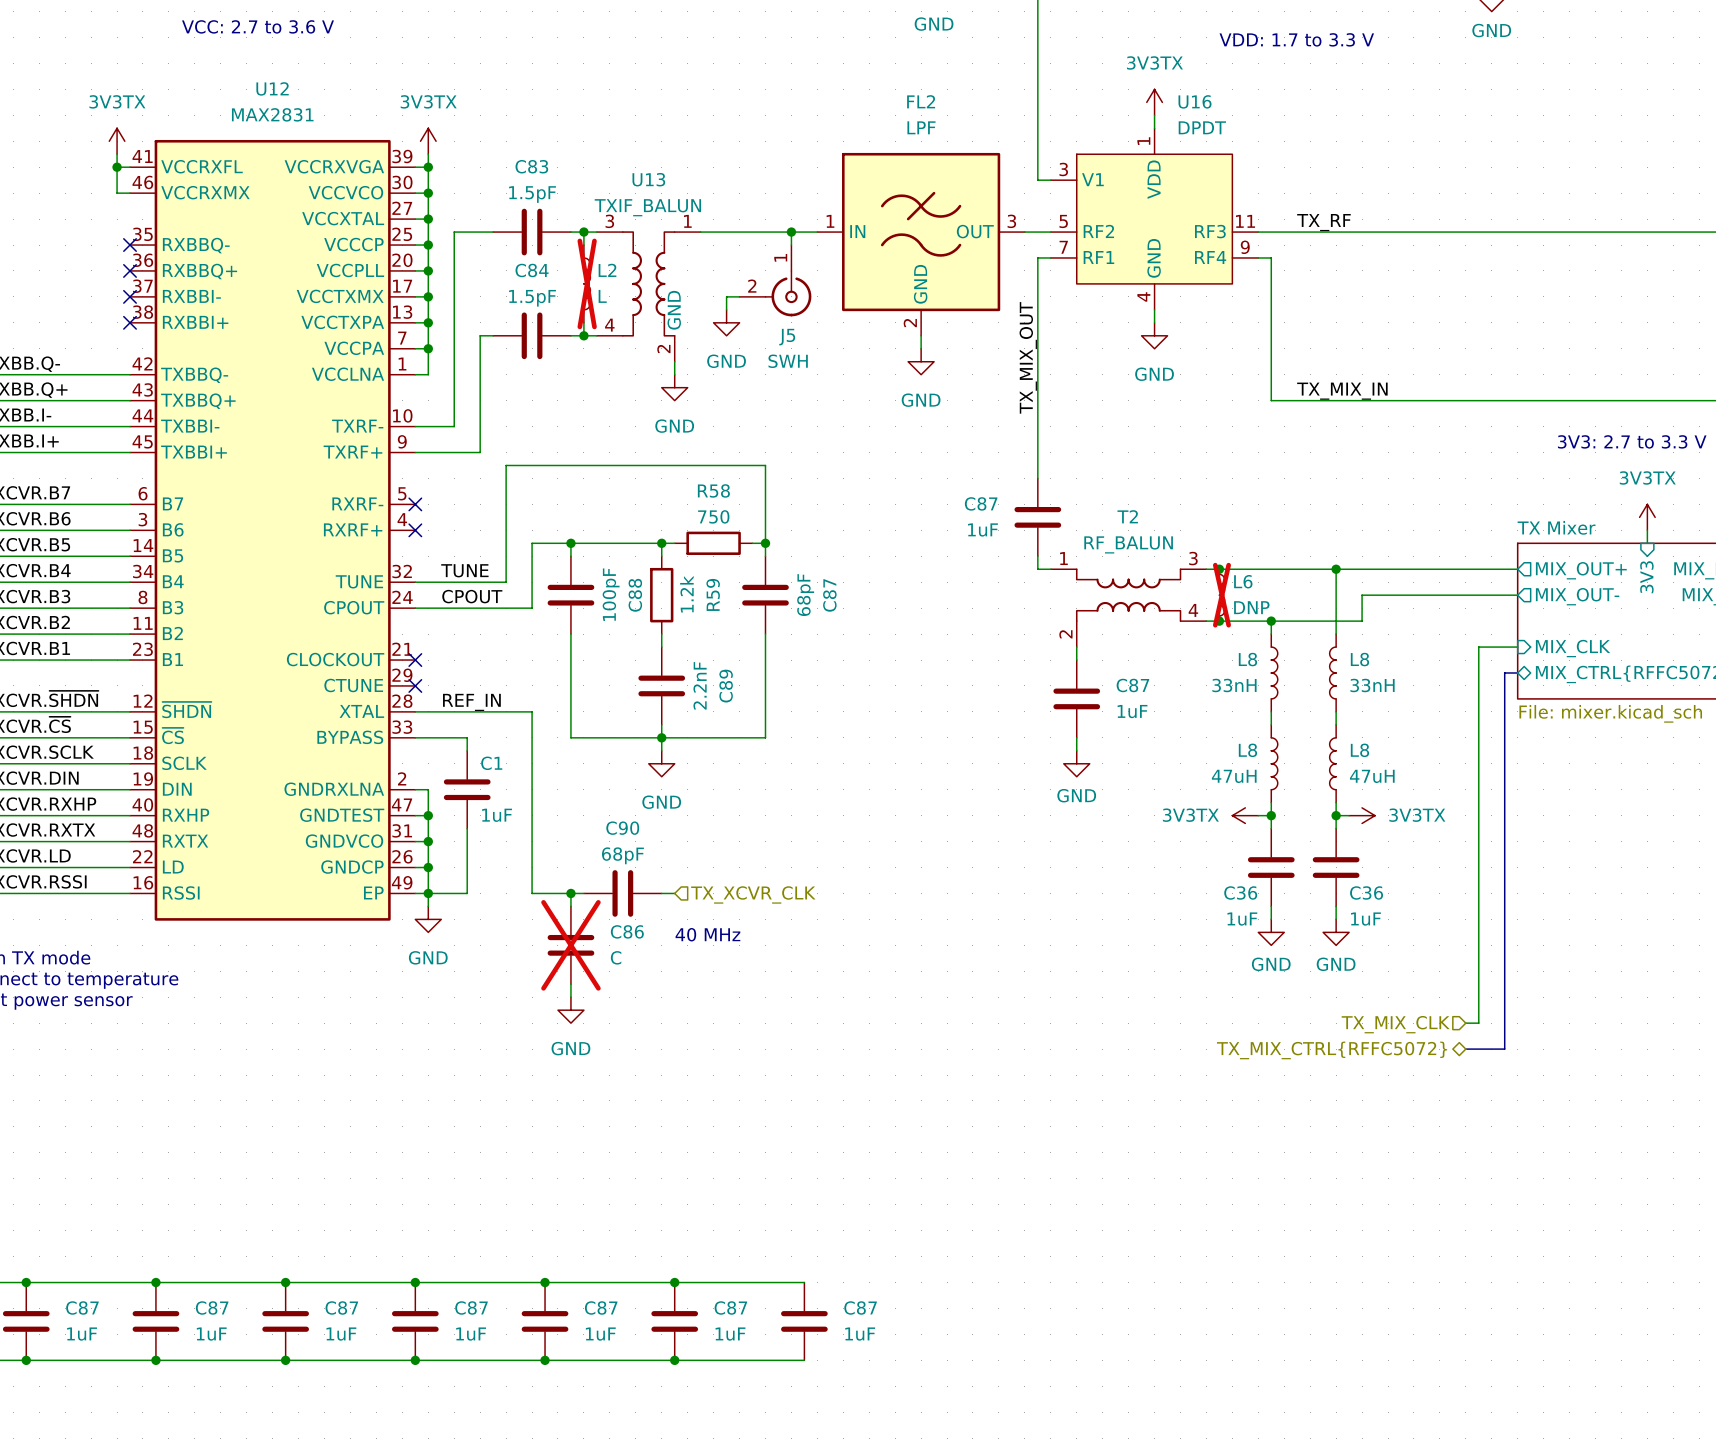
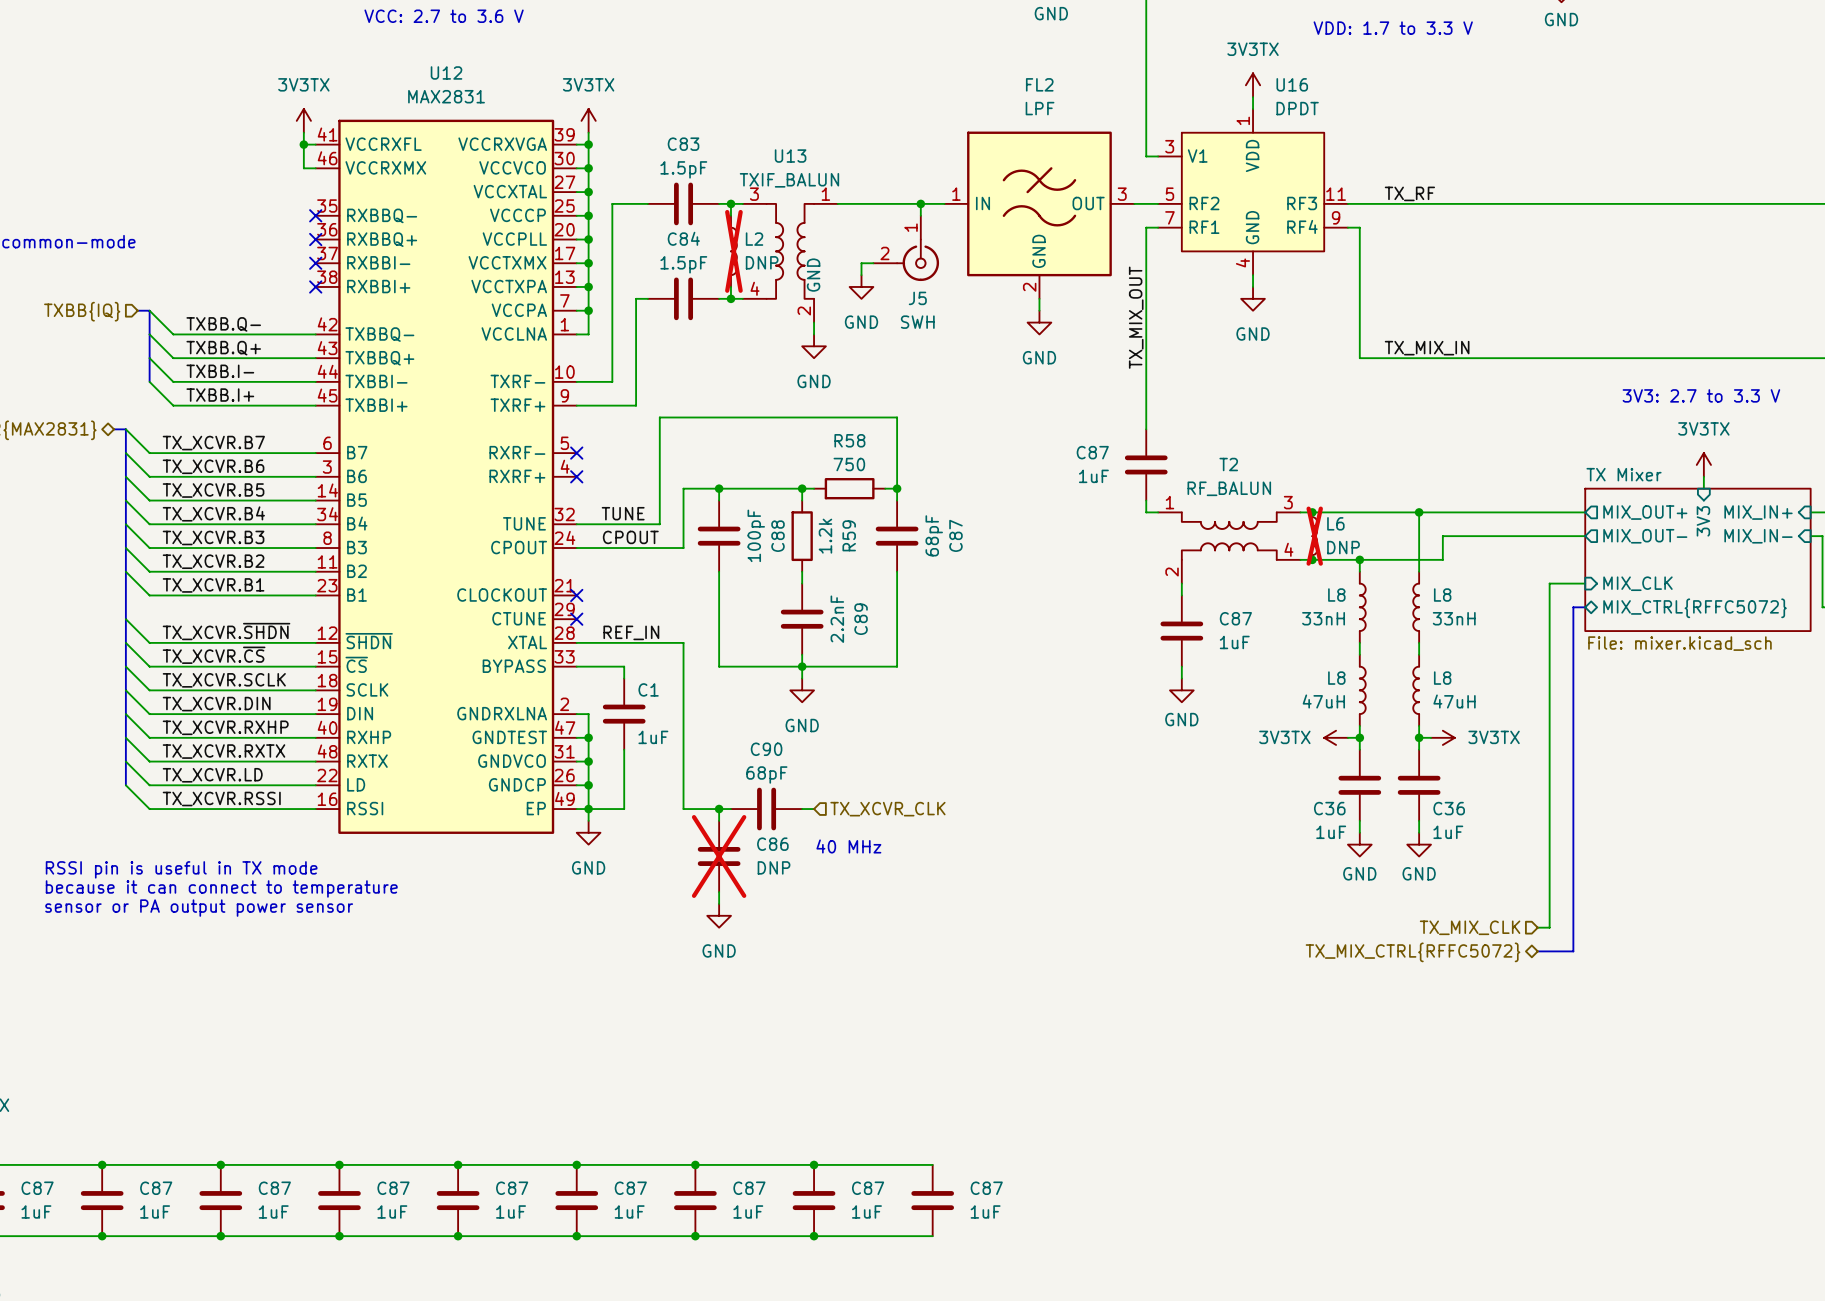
L2 value: L (602, 296) -> DNP (762, 262)
C86 value: C (616, 957) -> DNP (774, 867)

